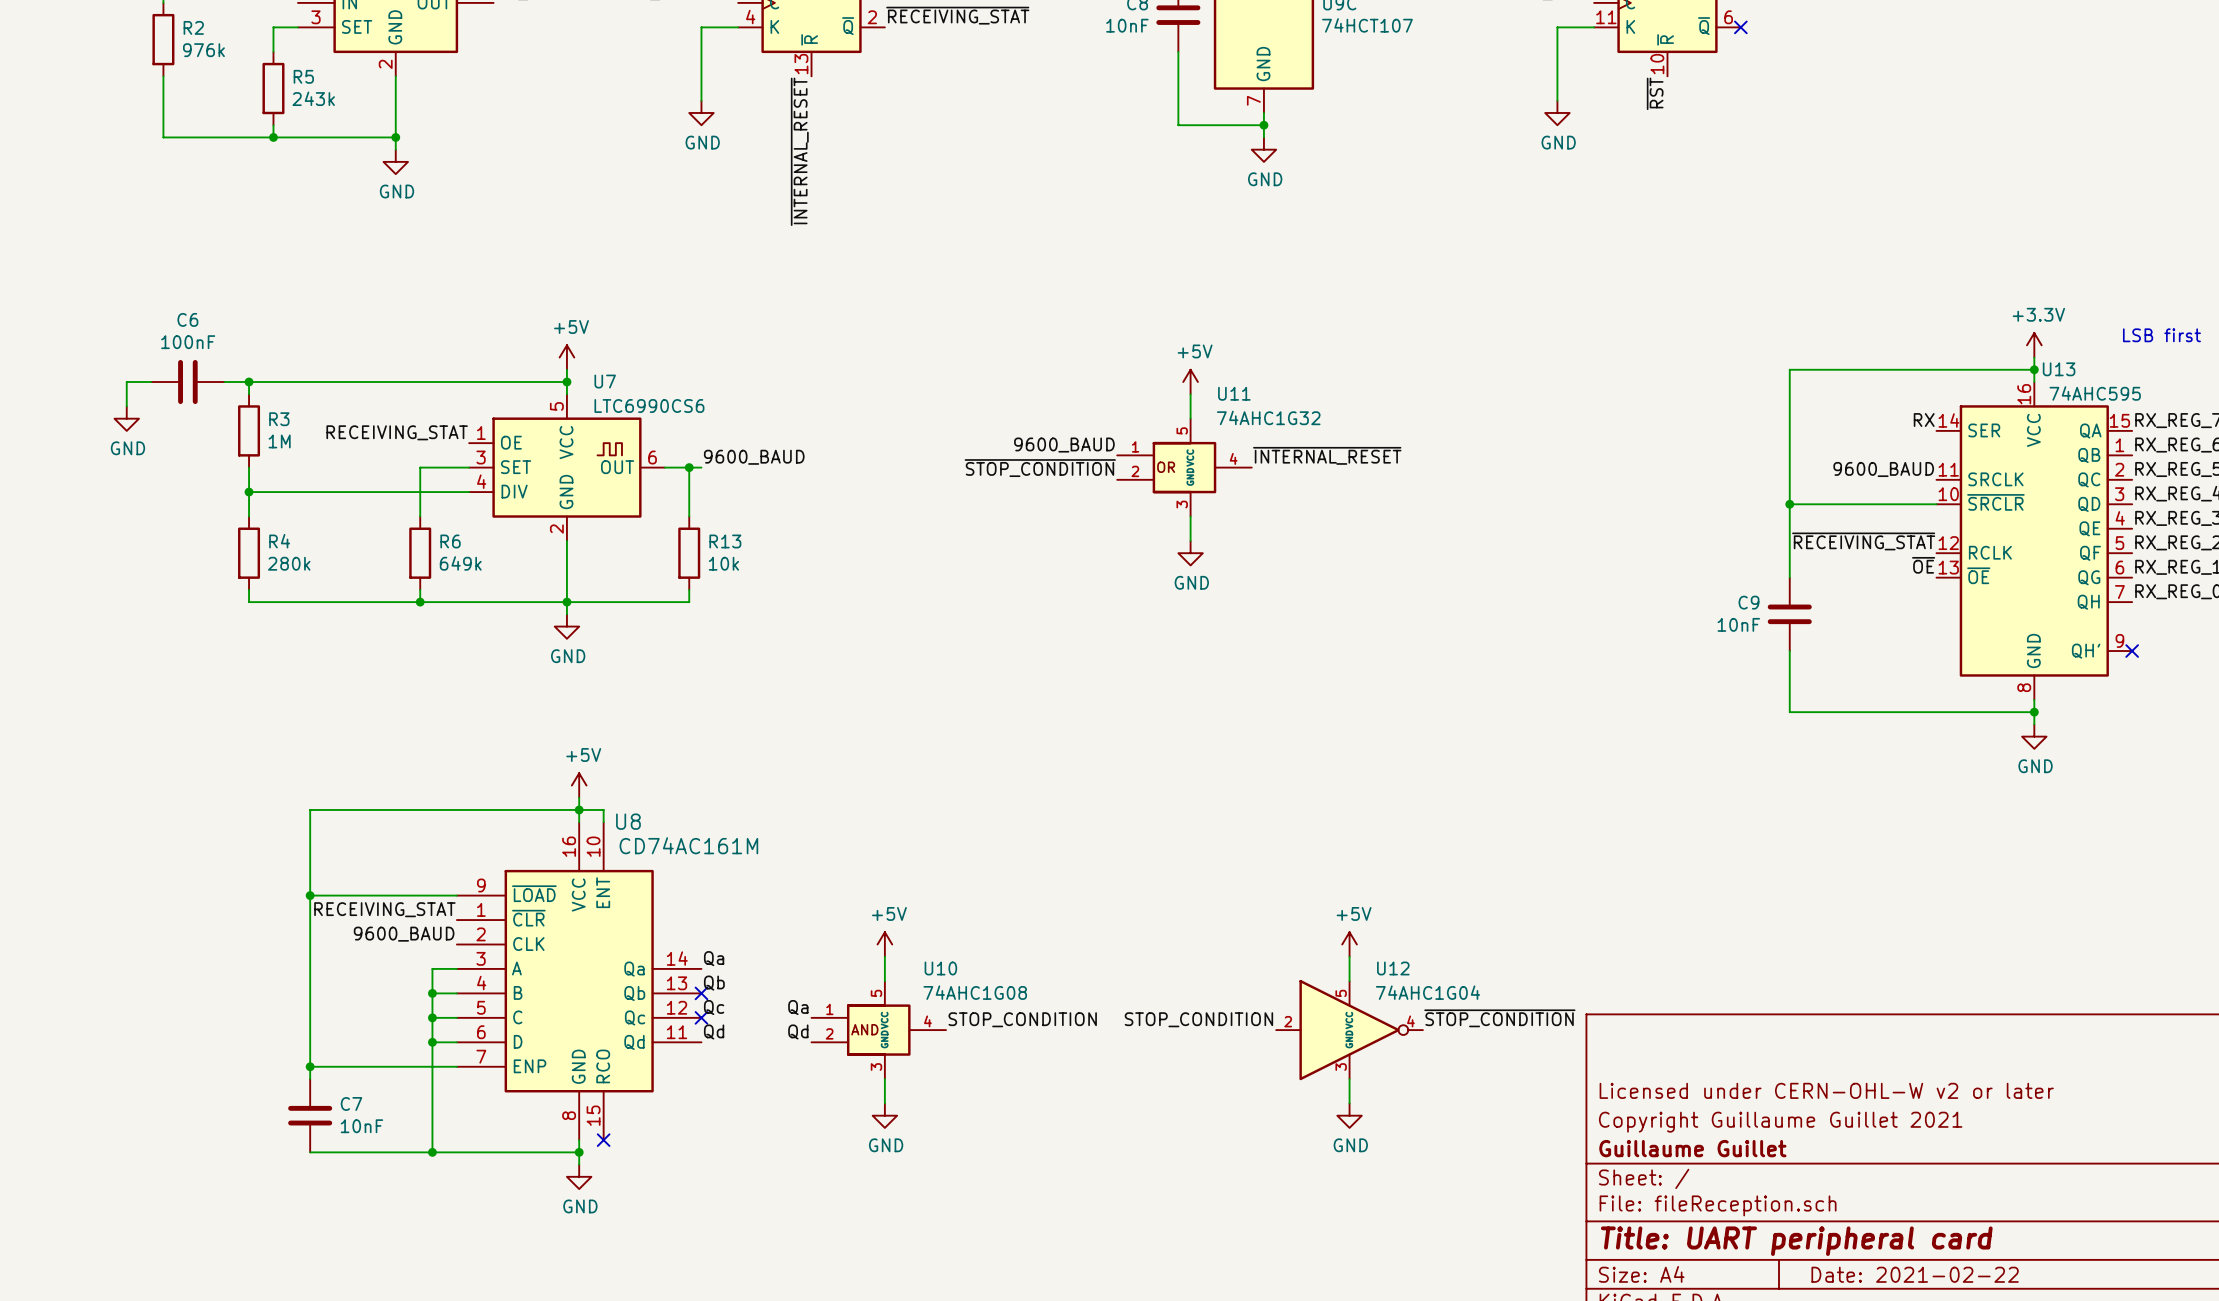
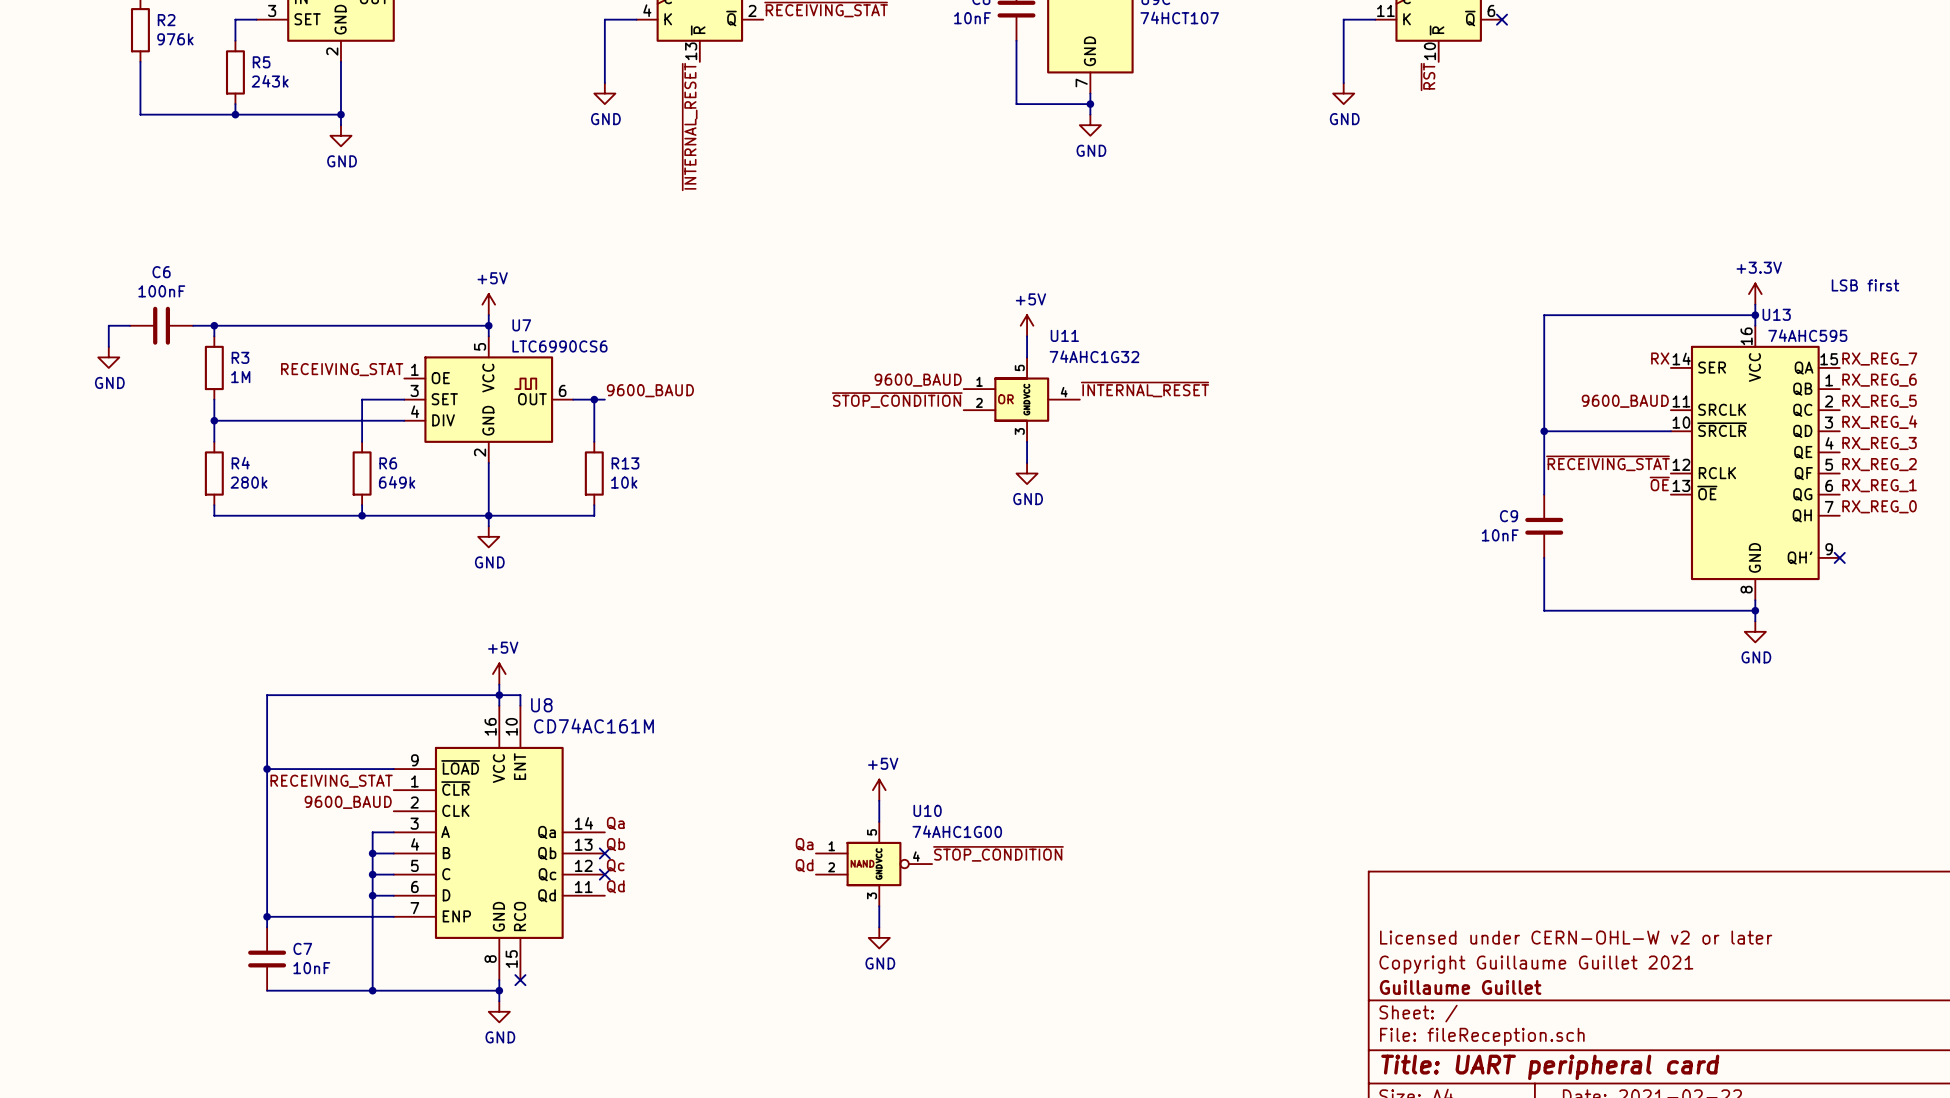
power symbol position: +5V (884, 944) -> +5V (879, 790)
power symbol: +5V (1349, 944) -> none
wire: (884, 956) (884, 981) -> (879, 800) (879, 821)
wire: (1349, 956) (1349, 981) -> none
U10 symbol: [811, 981, 947, 1080] -> [815, 821, 933, 907]
U10 value: 74AHC1G08 (975, 992) -> 74AHC1G00 (957, 831)
label: none -> ~{STOP_CONDITION} (998, 853)
label position: Qa (798, 1007) -> Qa (804, 844)
label: ~{STOP_CONDITION} (1499, 1018) -> none
label: STOP_CONDITION (1022, 1019) -> none
label: STOP_CONDITION (1198, 1019) -> none
U12: 74AHC1G04 (1349, 1030) -> none
label position: Qd (798, 1031) -> Qd (804, 865)
wire: (884, 1079) (884, 1103) -> (879, 906) (879, 927)
wire: (1349, 1079) (1349, 1103) -> none
power symbol position: GND (884, 1115) -> GND (879, 937)
power symbol: GND (1349, 1115) -> none

